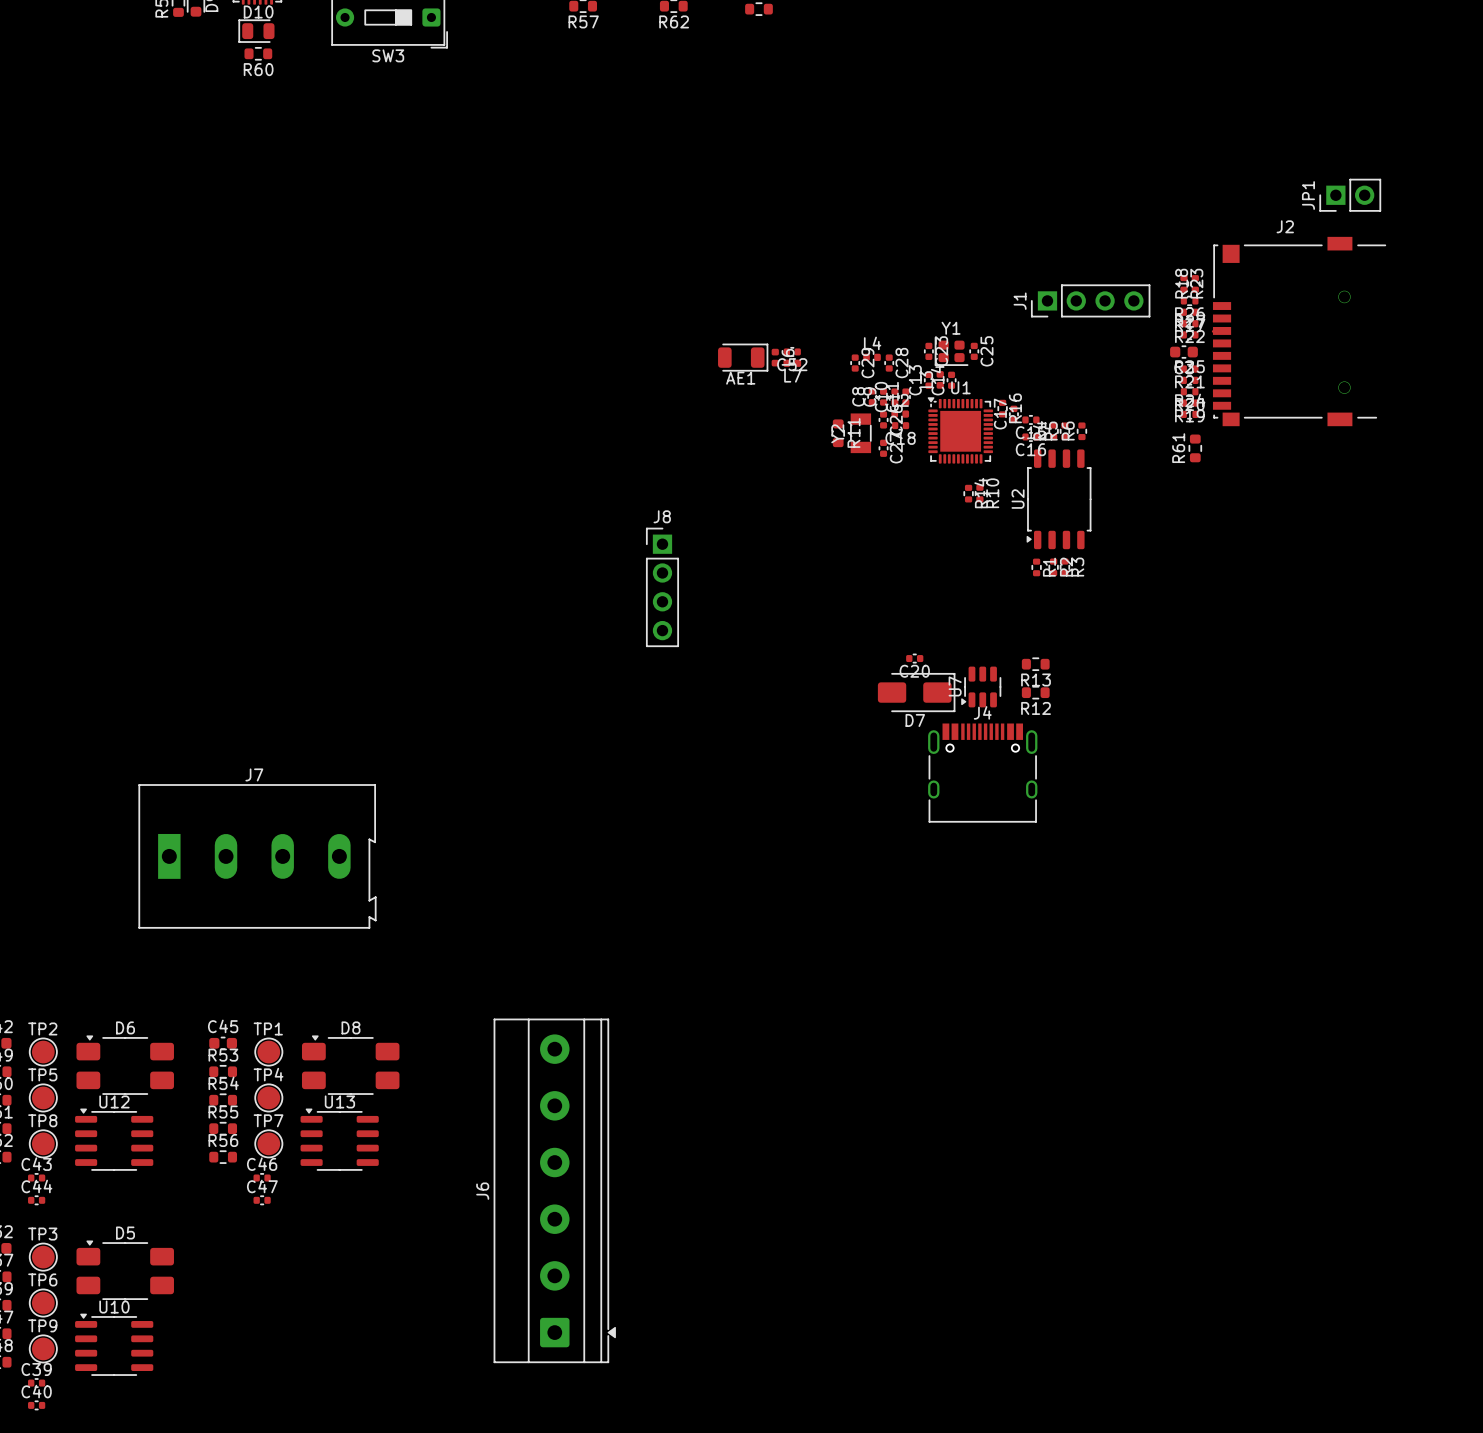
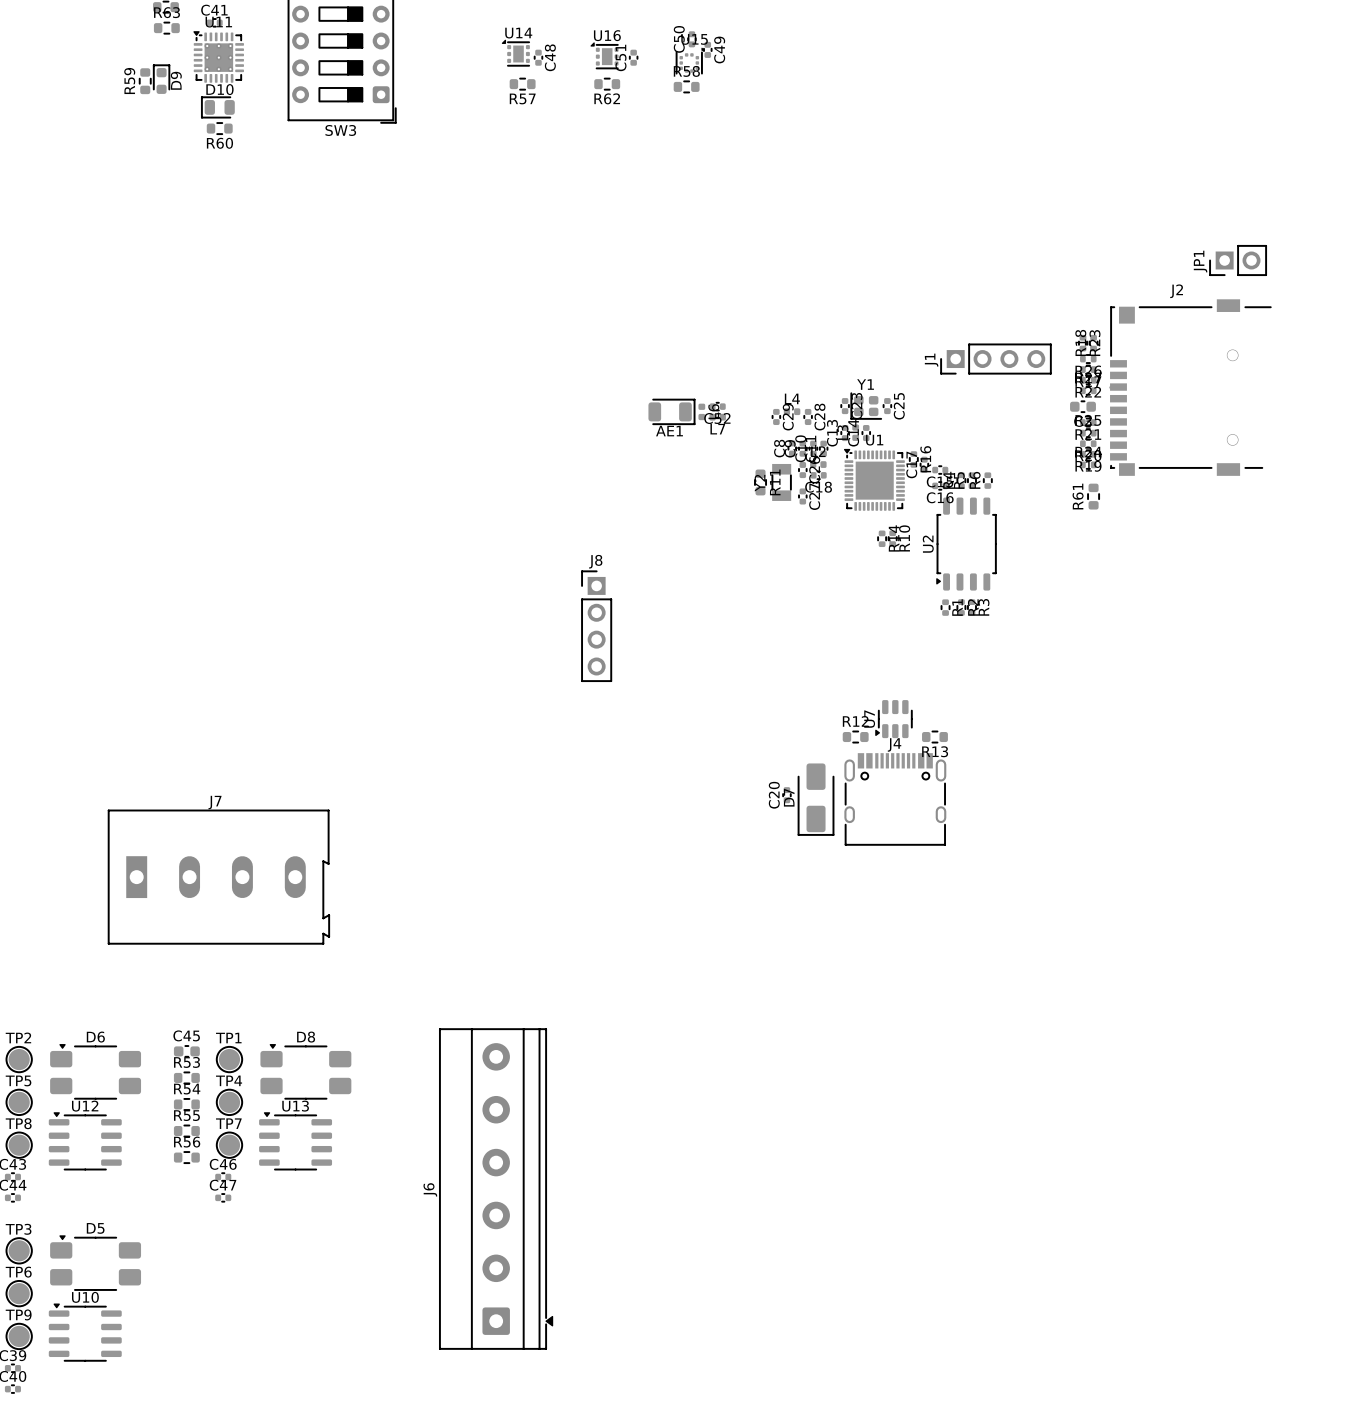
C20 rotation: 0° (914, 658) -> 90° clockwise (786, 795)
C20 position: (914, 658) -> (786, 795)
R13 position: (1035, 664) -> (934, 737)
D7 rotation: 0° (916, 692) -> 90° clockwise (816, 799)
D7 position: (916, 692) -> (816, 799)
R12 position: (1035, 692) -> (855, 737)
R12 name position: R12 (1036, 708) -> R12 (855, 721)

